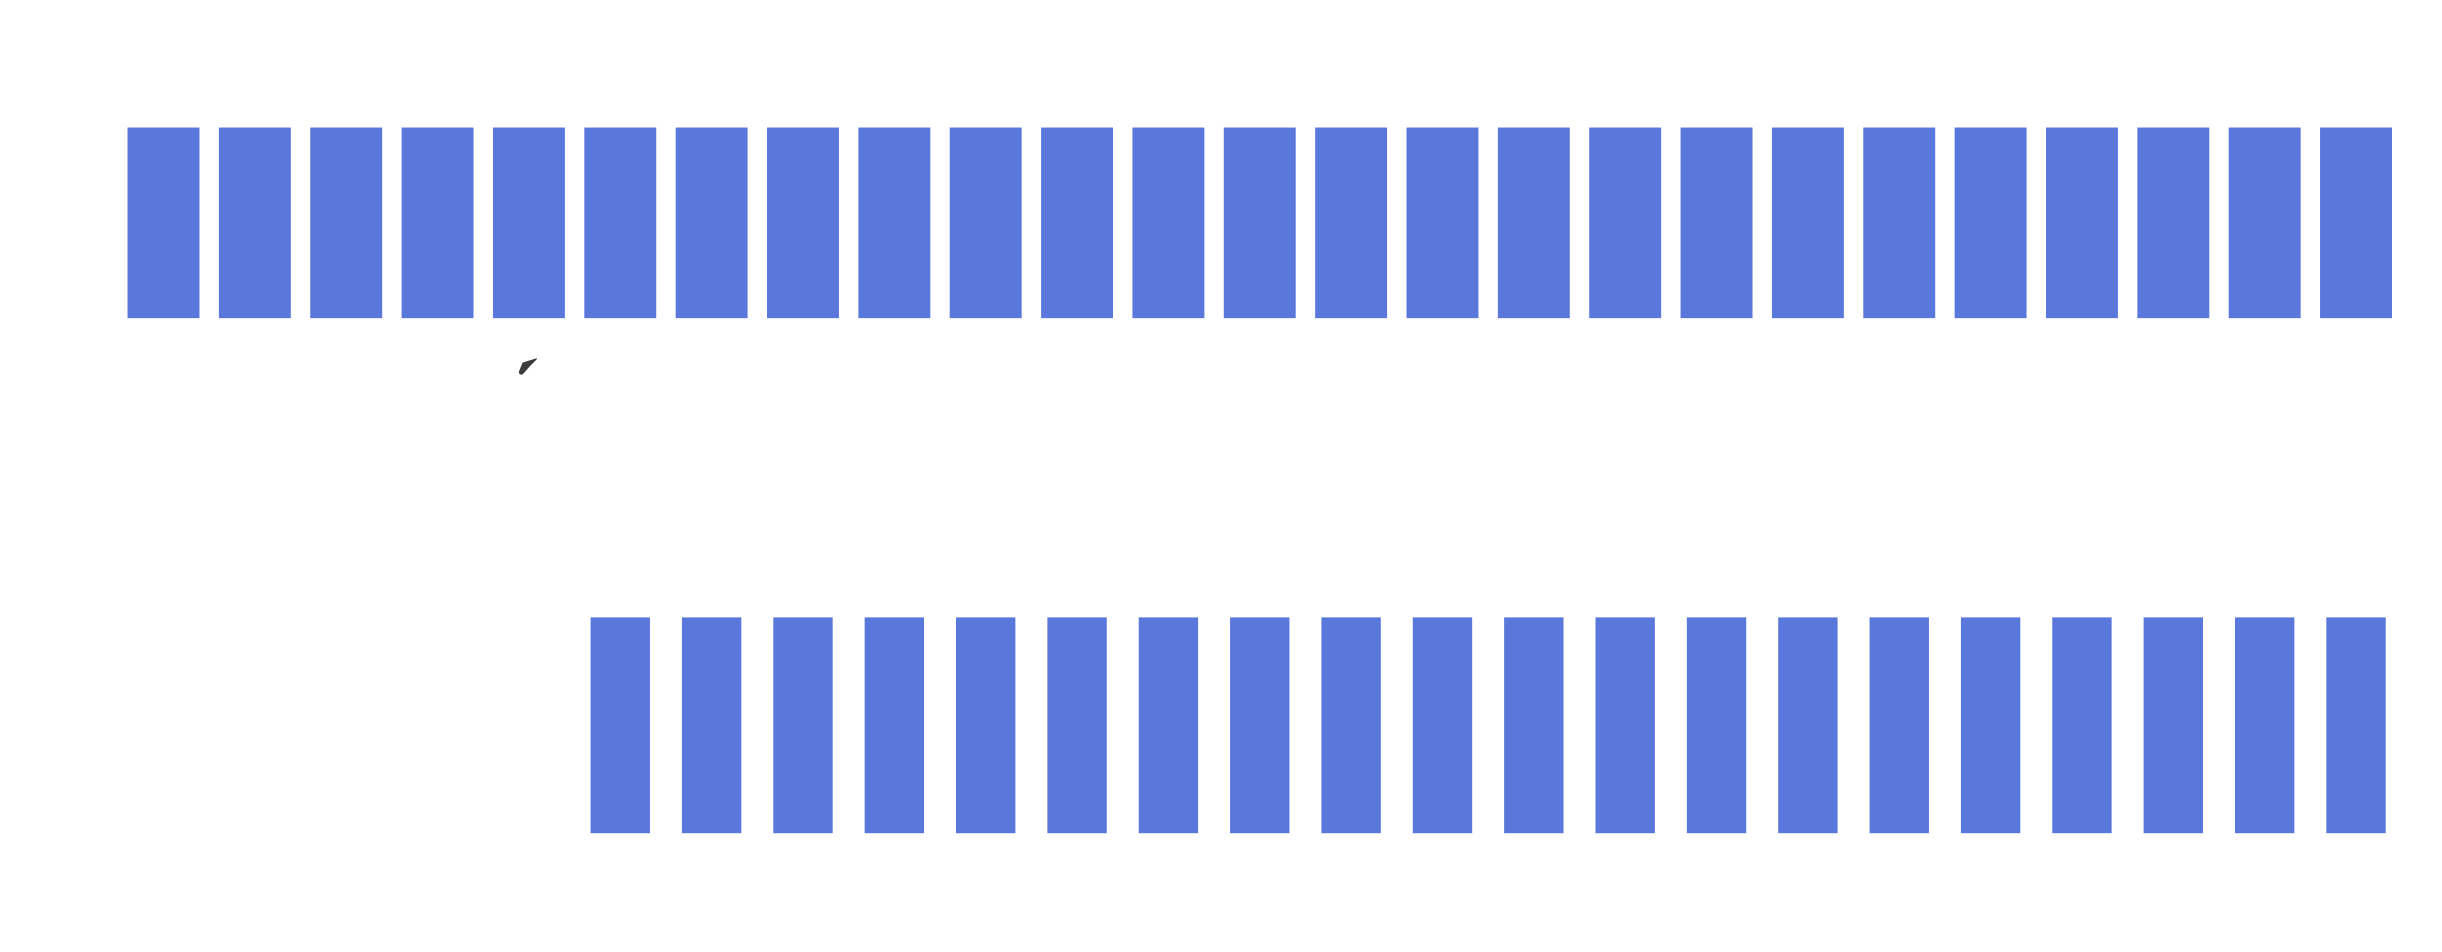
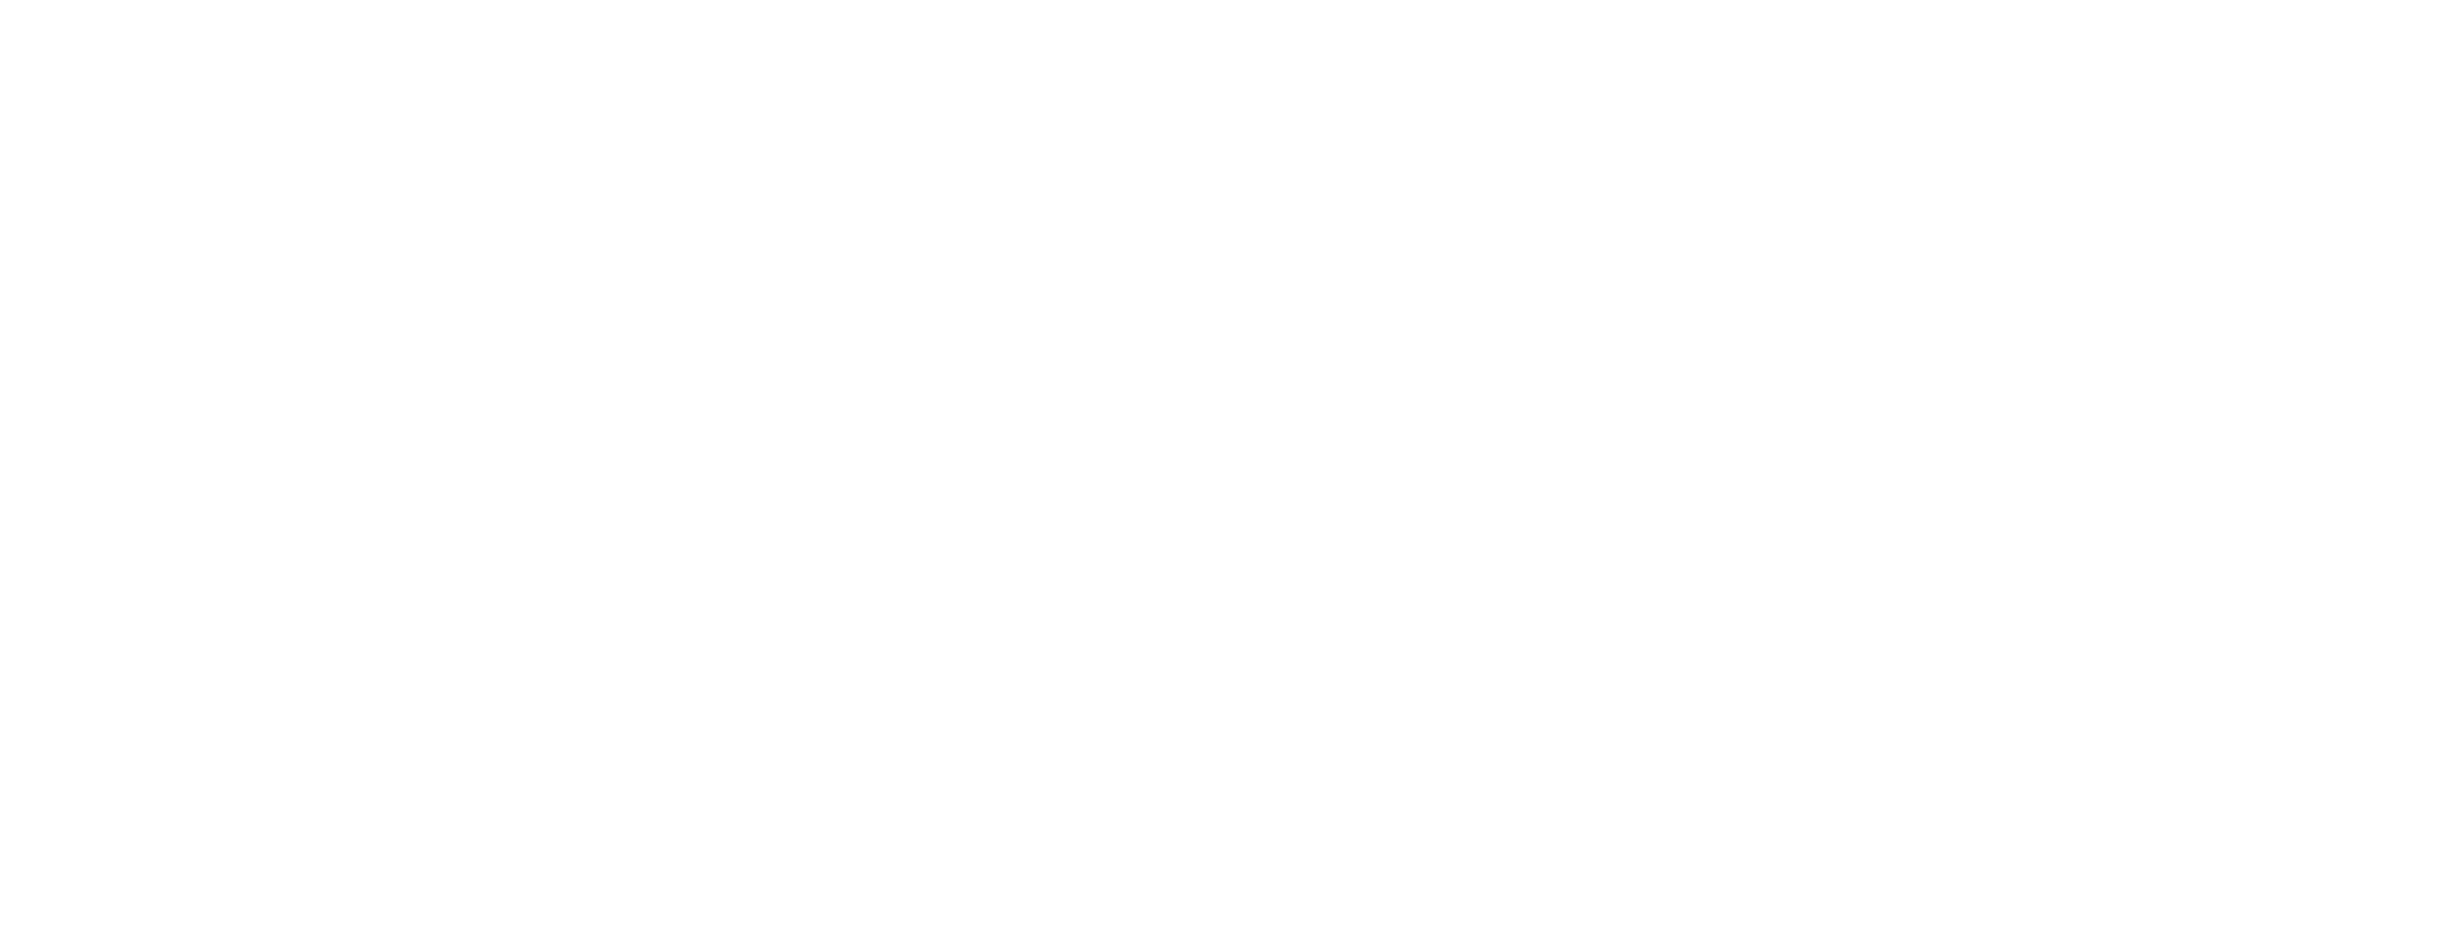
part: (1259, 222) -> none
drawing: [518, 358, 538, 375] -> none
part: (1488, 725) -> none

